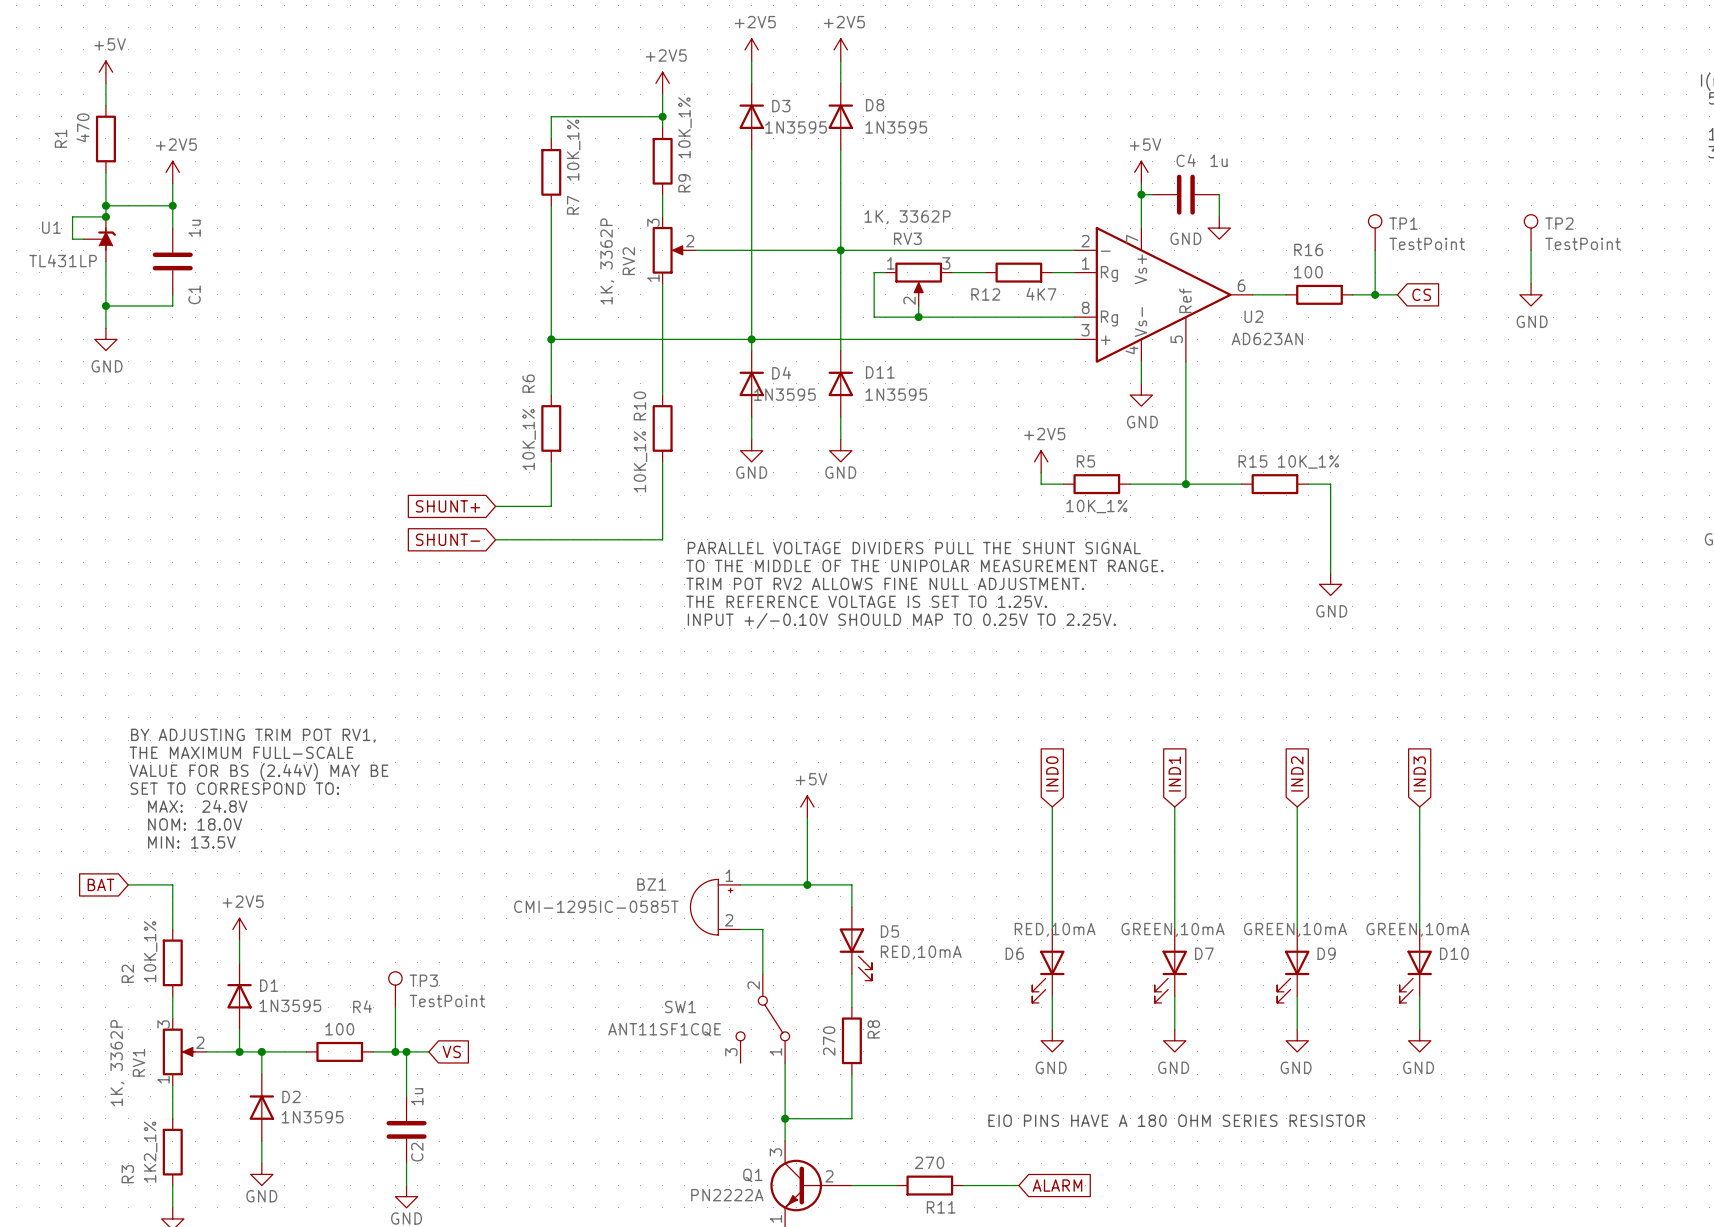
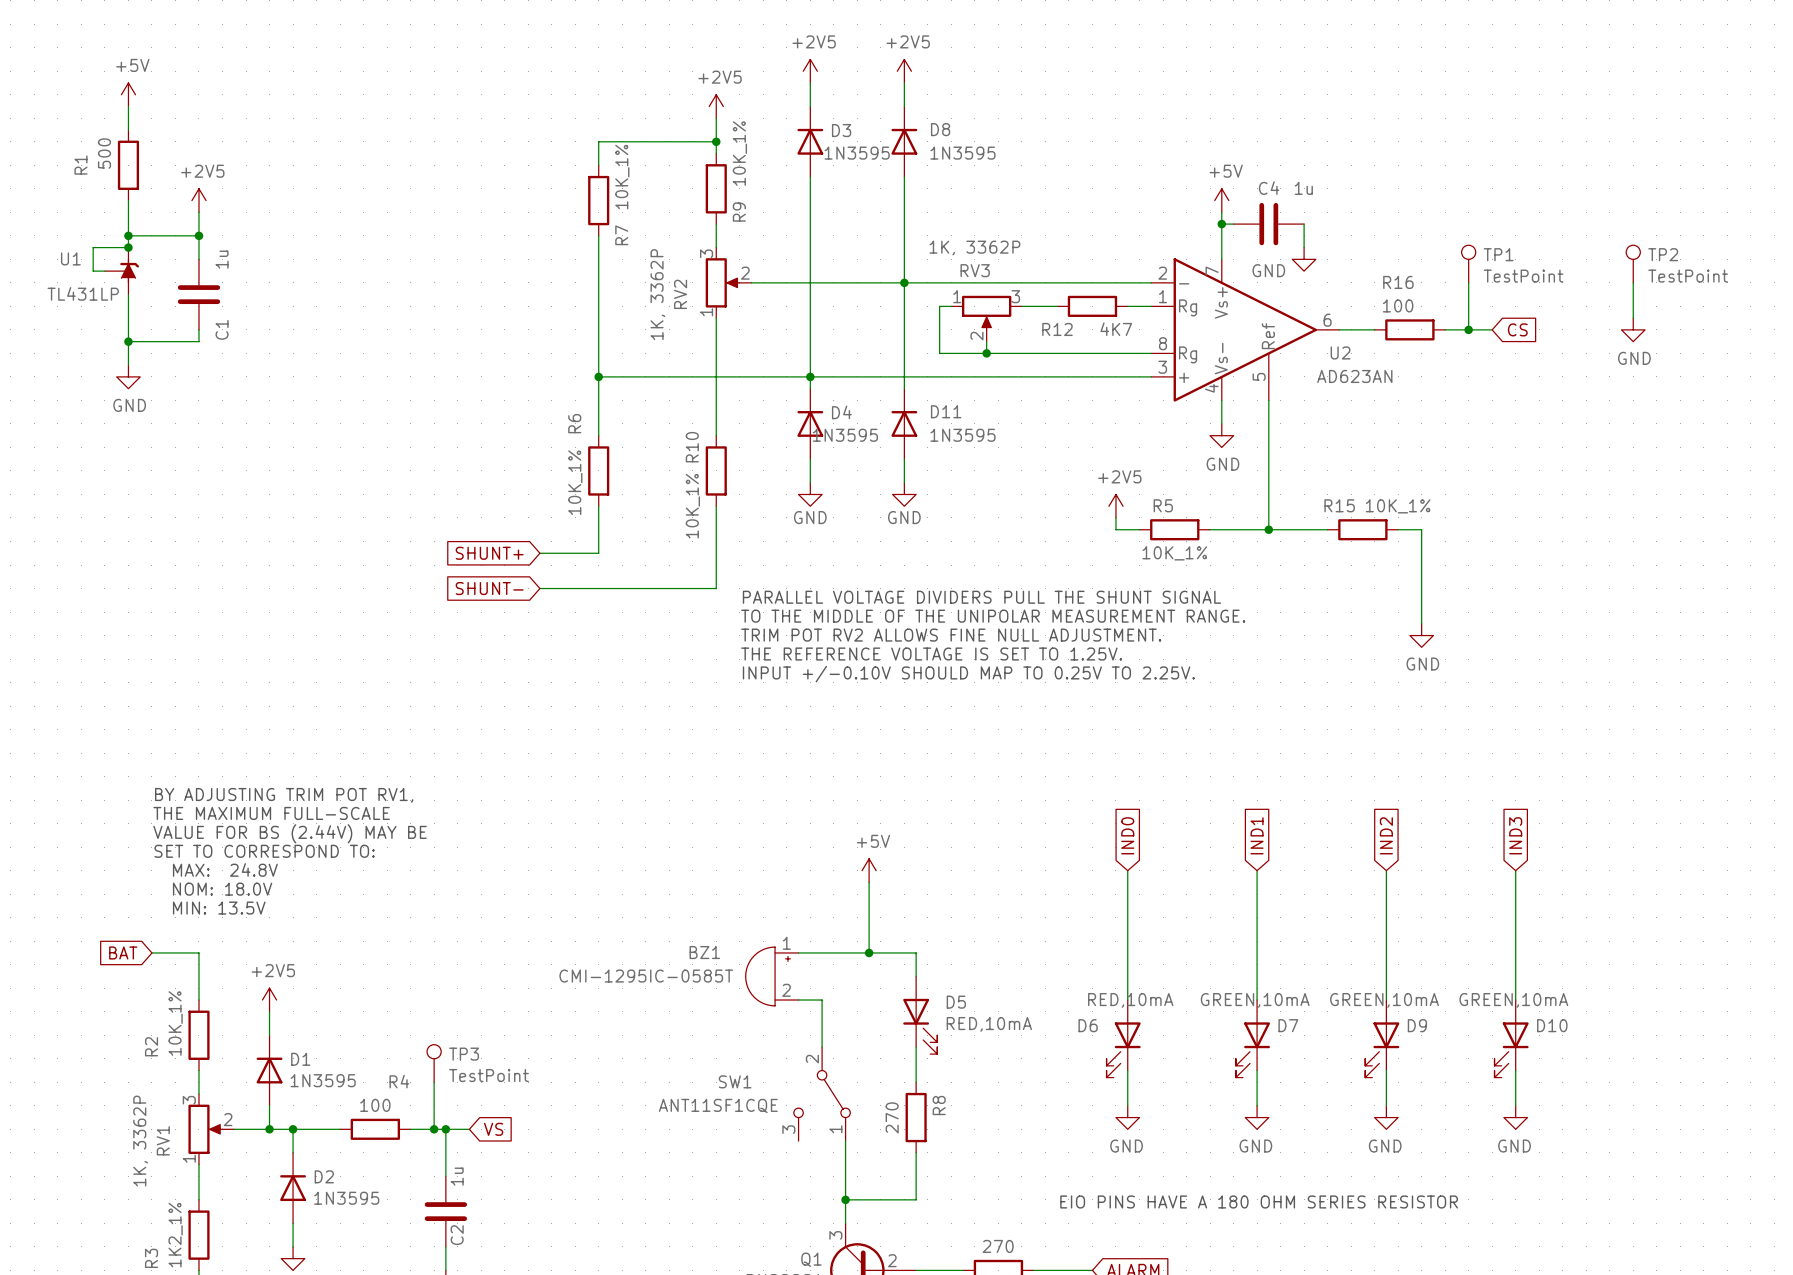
R1 value: 470 (83, 127) -> 500 (104, 153)

